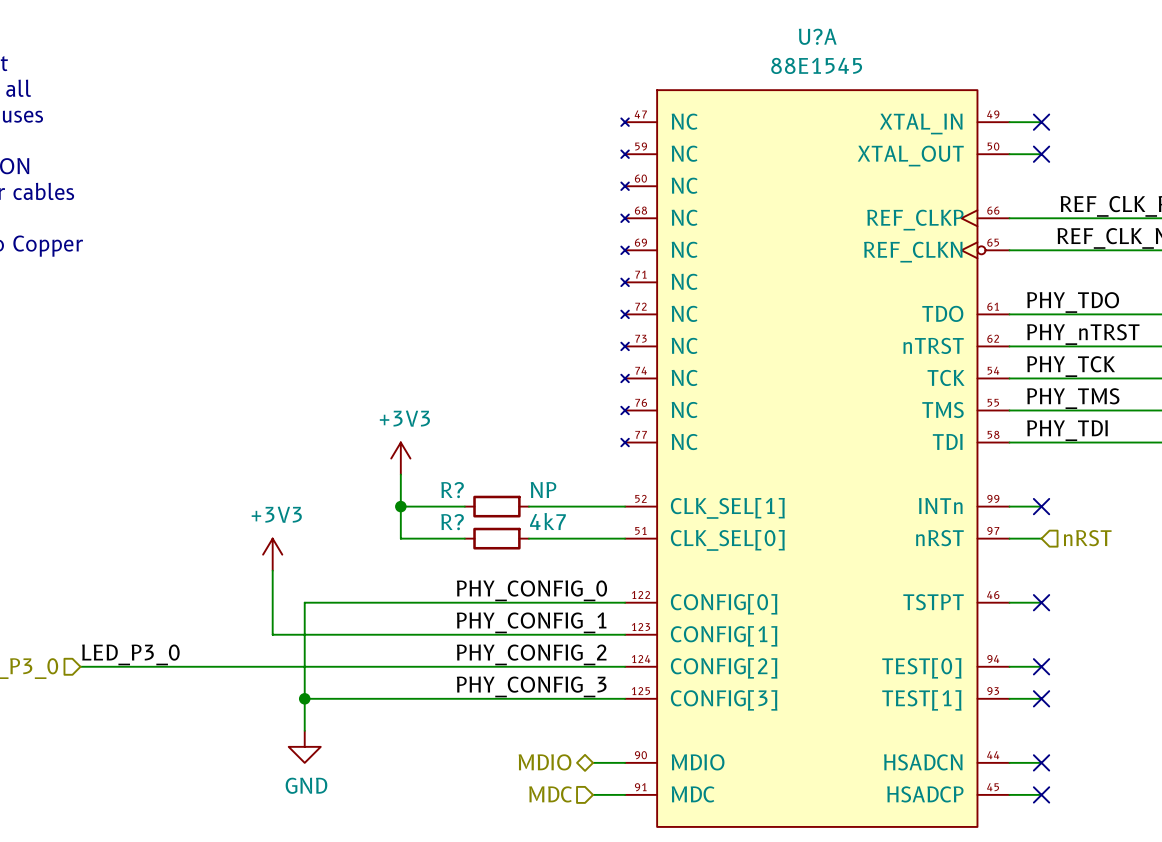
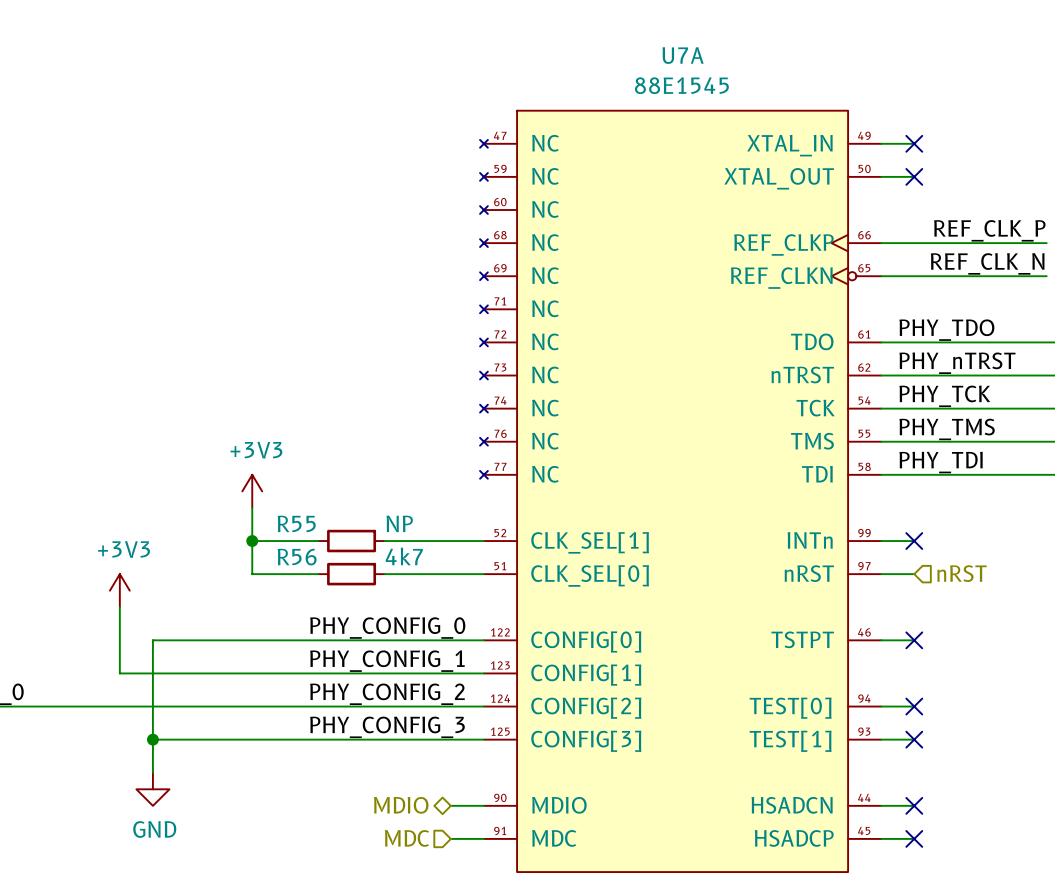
U?A name: U?A (817, 36) -> U7A (683, 55)
R? name: R? (452, 490) -> R55 (296, 523)
R? name: R? (452, 522) -> R56 (297, 557)

